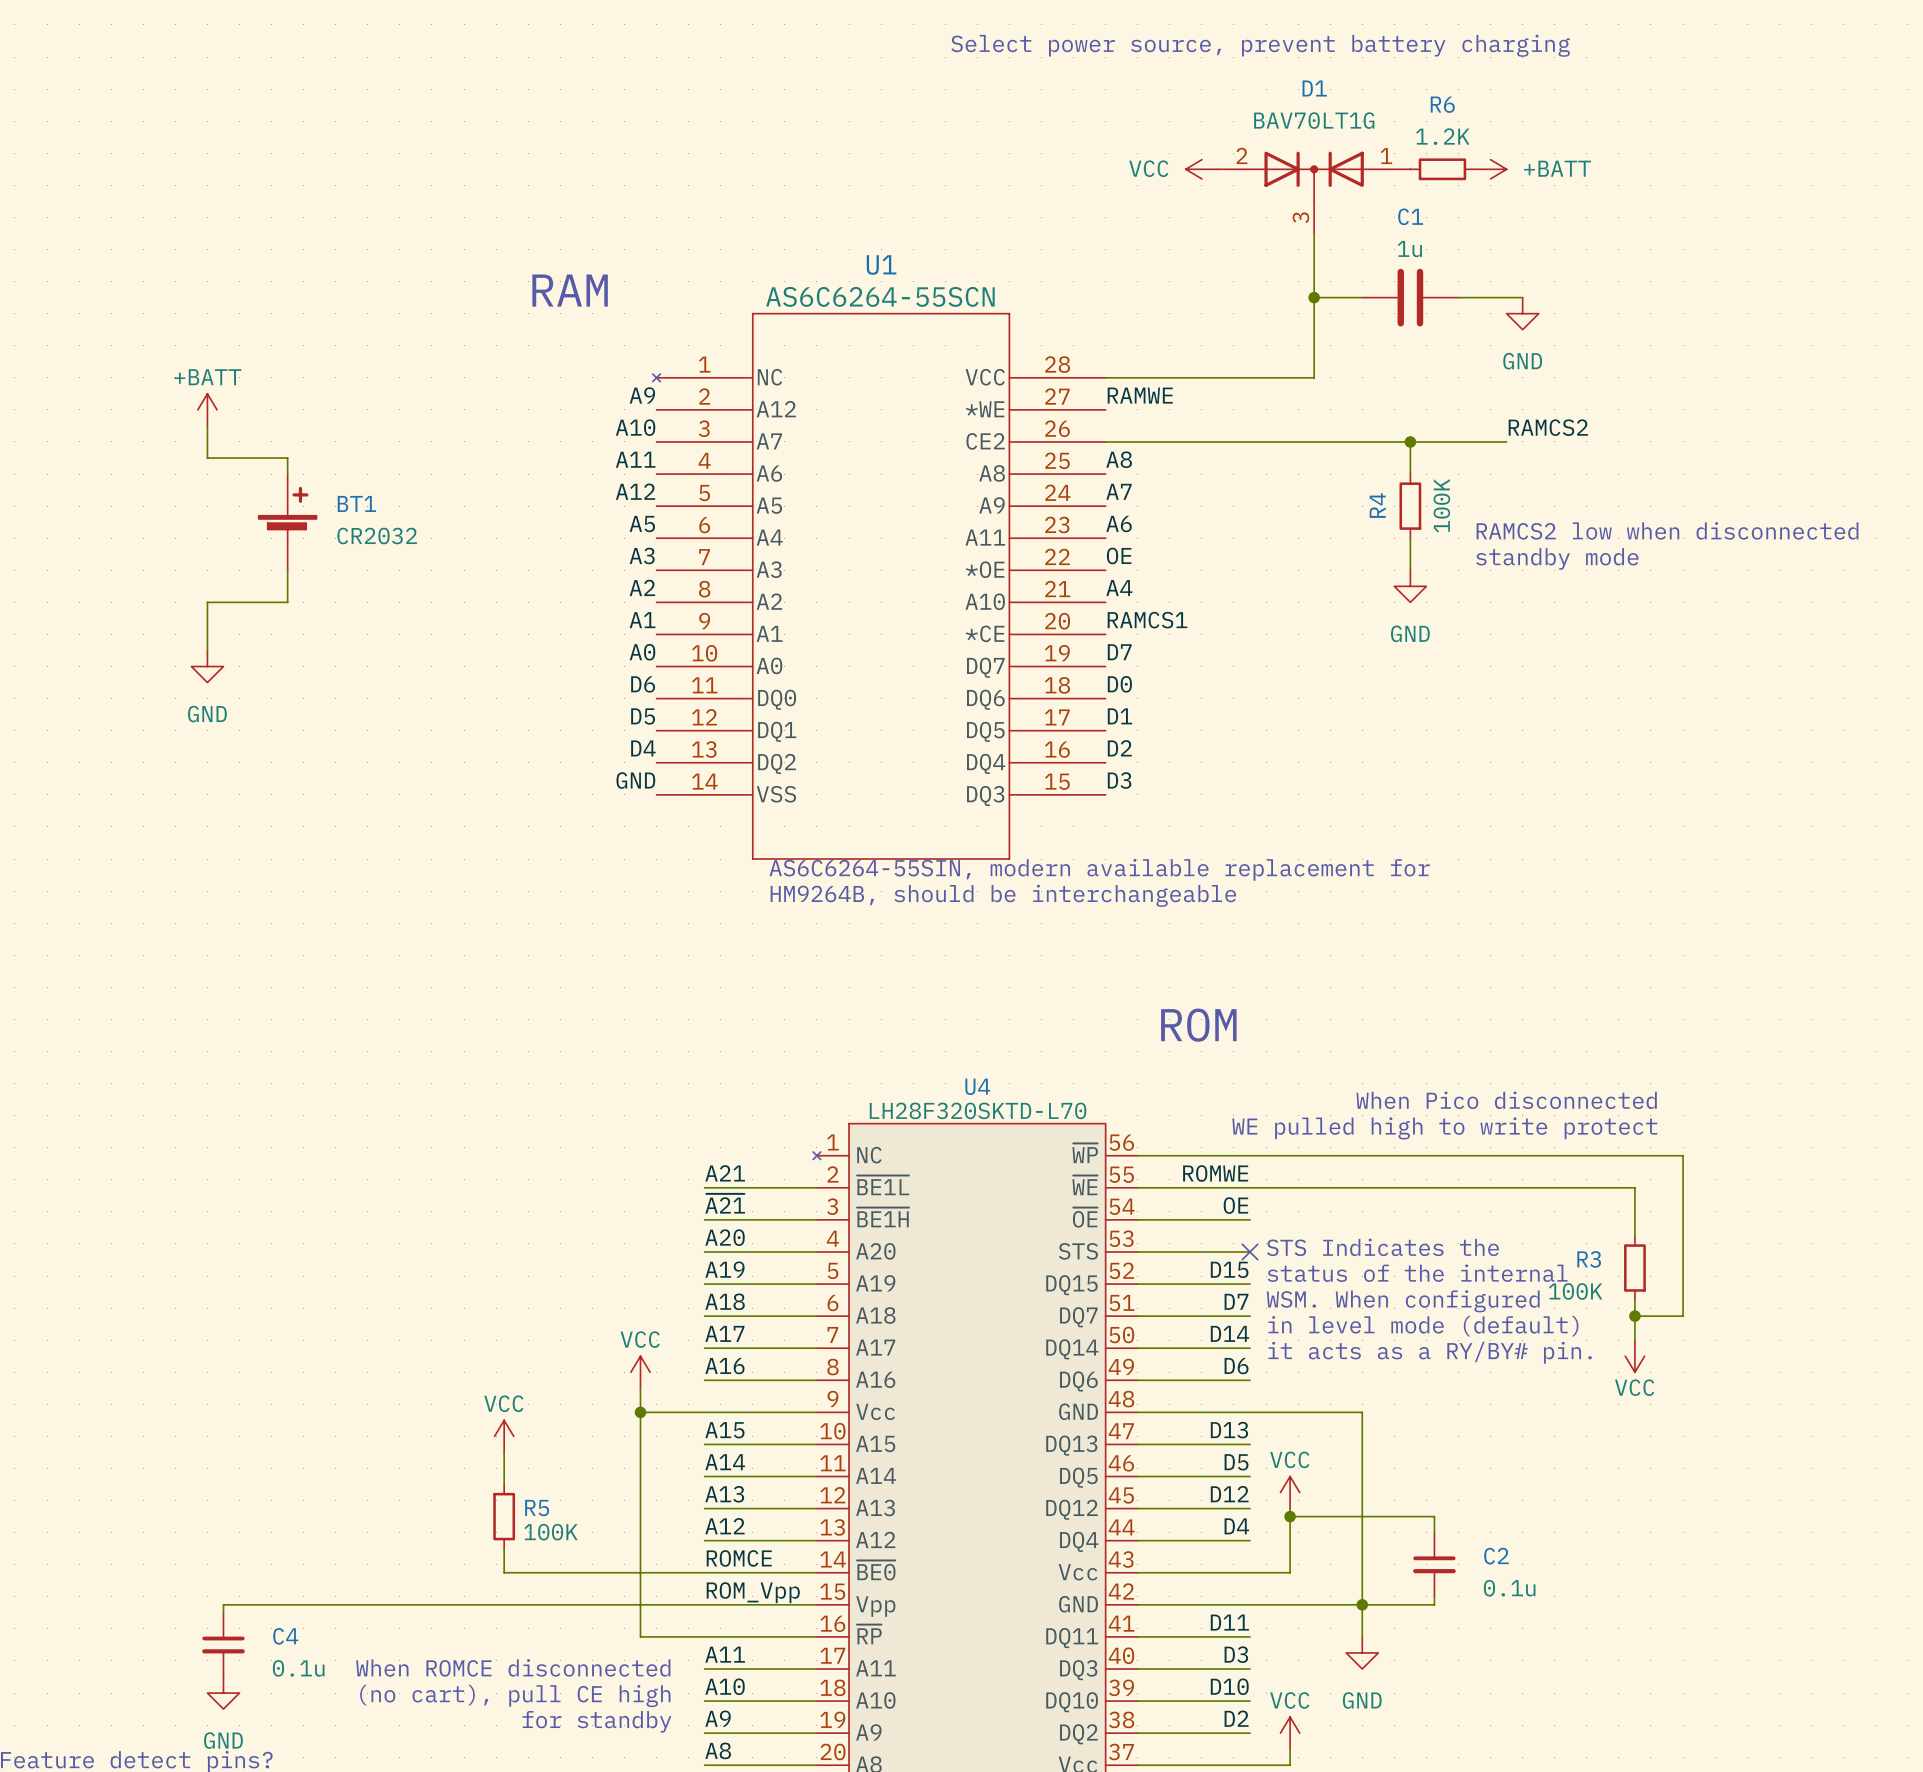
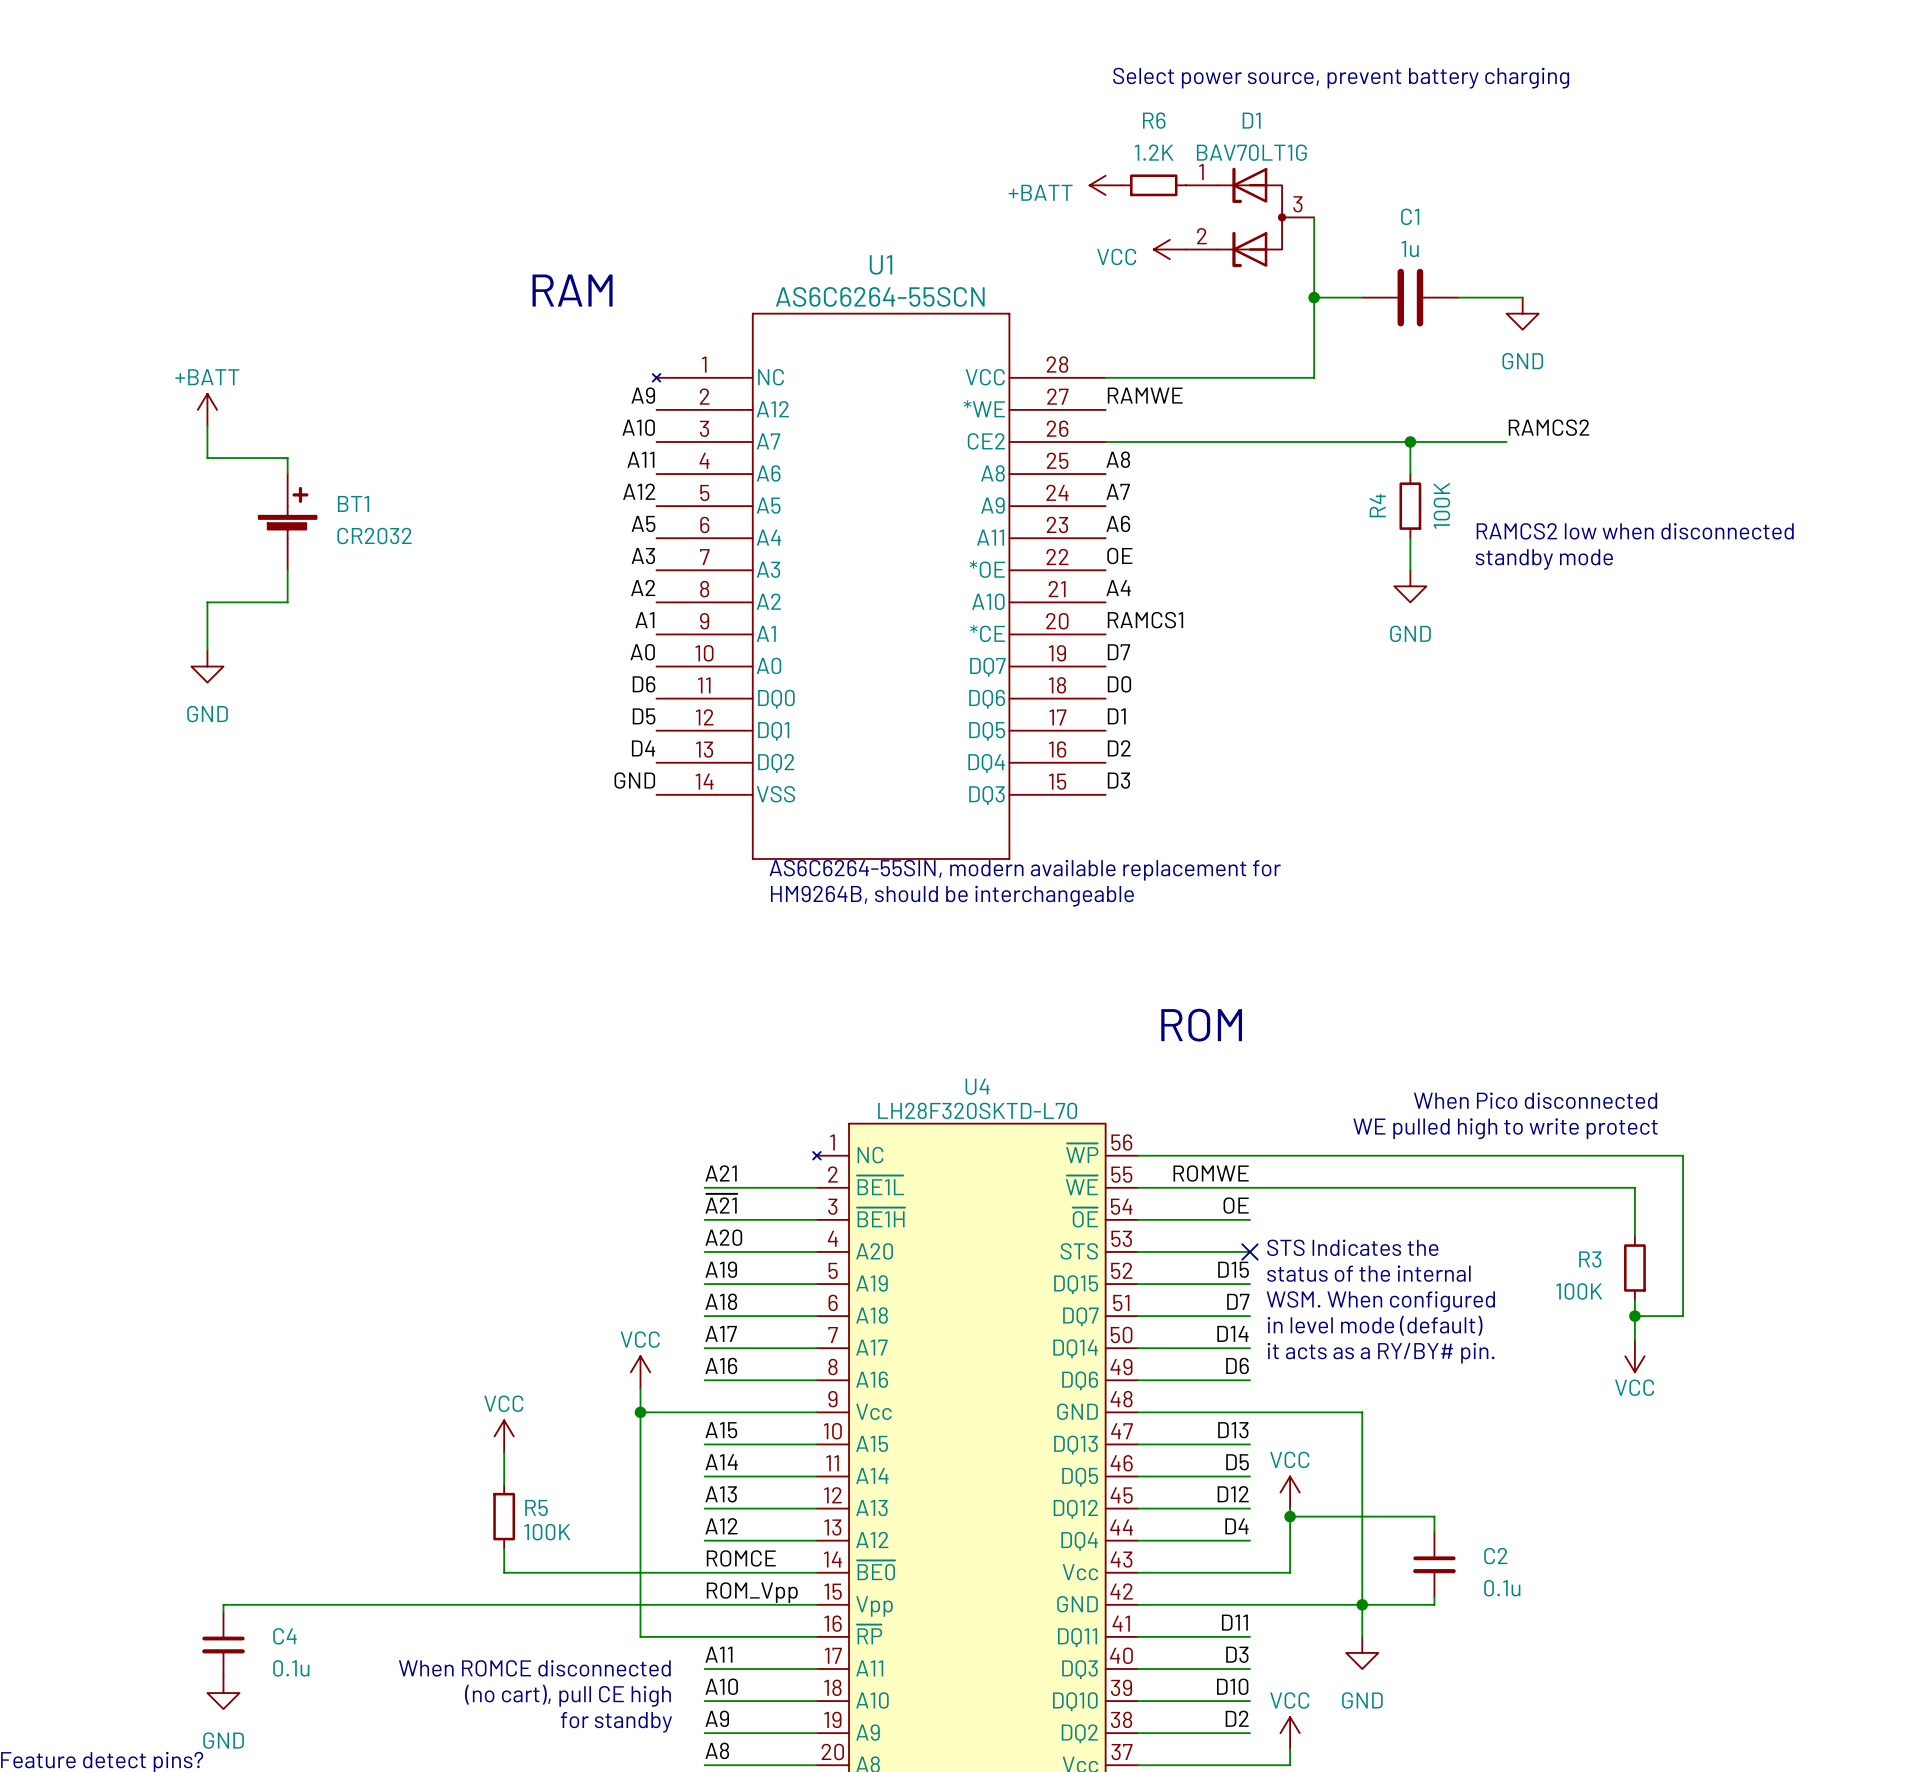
text position: Select power source, prevent battery charging (1260, 45) -> Select power source, prevent battery charging (1341, 78)
D1 symbol: [1217, 151, 1411, 234] -> [1185, 167, 1315, 268]
power symbol text position: VCC (1148, 168) -> VCC (1116, 256)
power symbol position: VCC (1201, 169) -> VCC (1169, 249)
R6 position: (1442, 169) -> (1153, 185)
power symbol: +BATT (1490, 169) -> none
power symbol: none -> +BATT (1105, 185)

